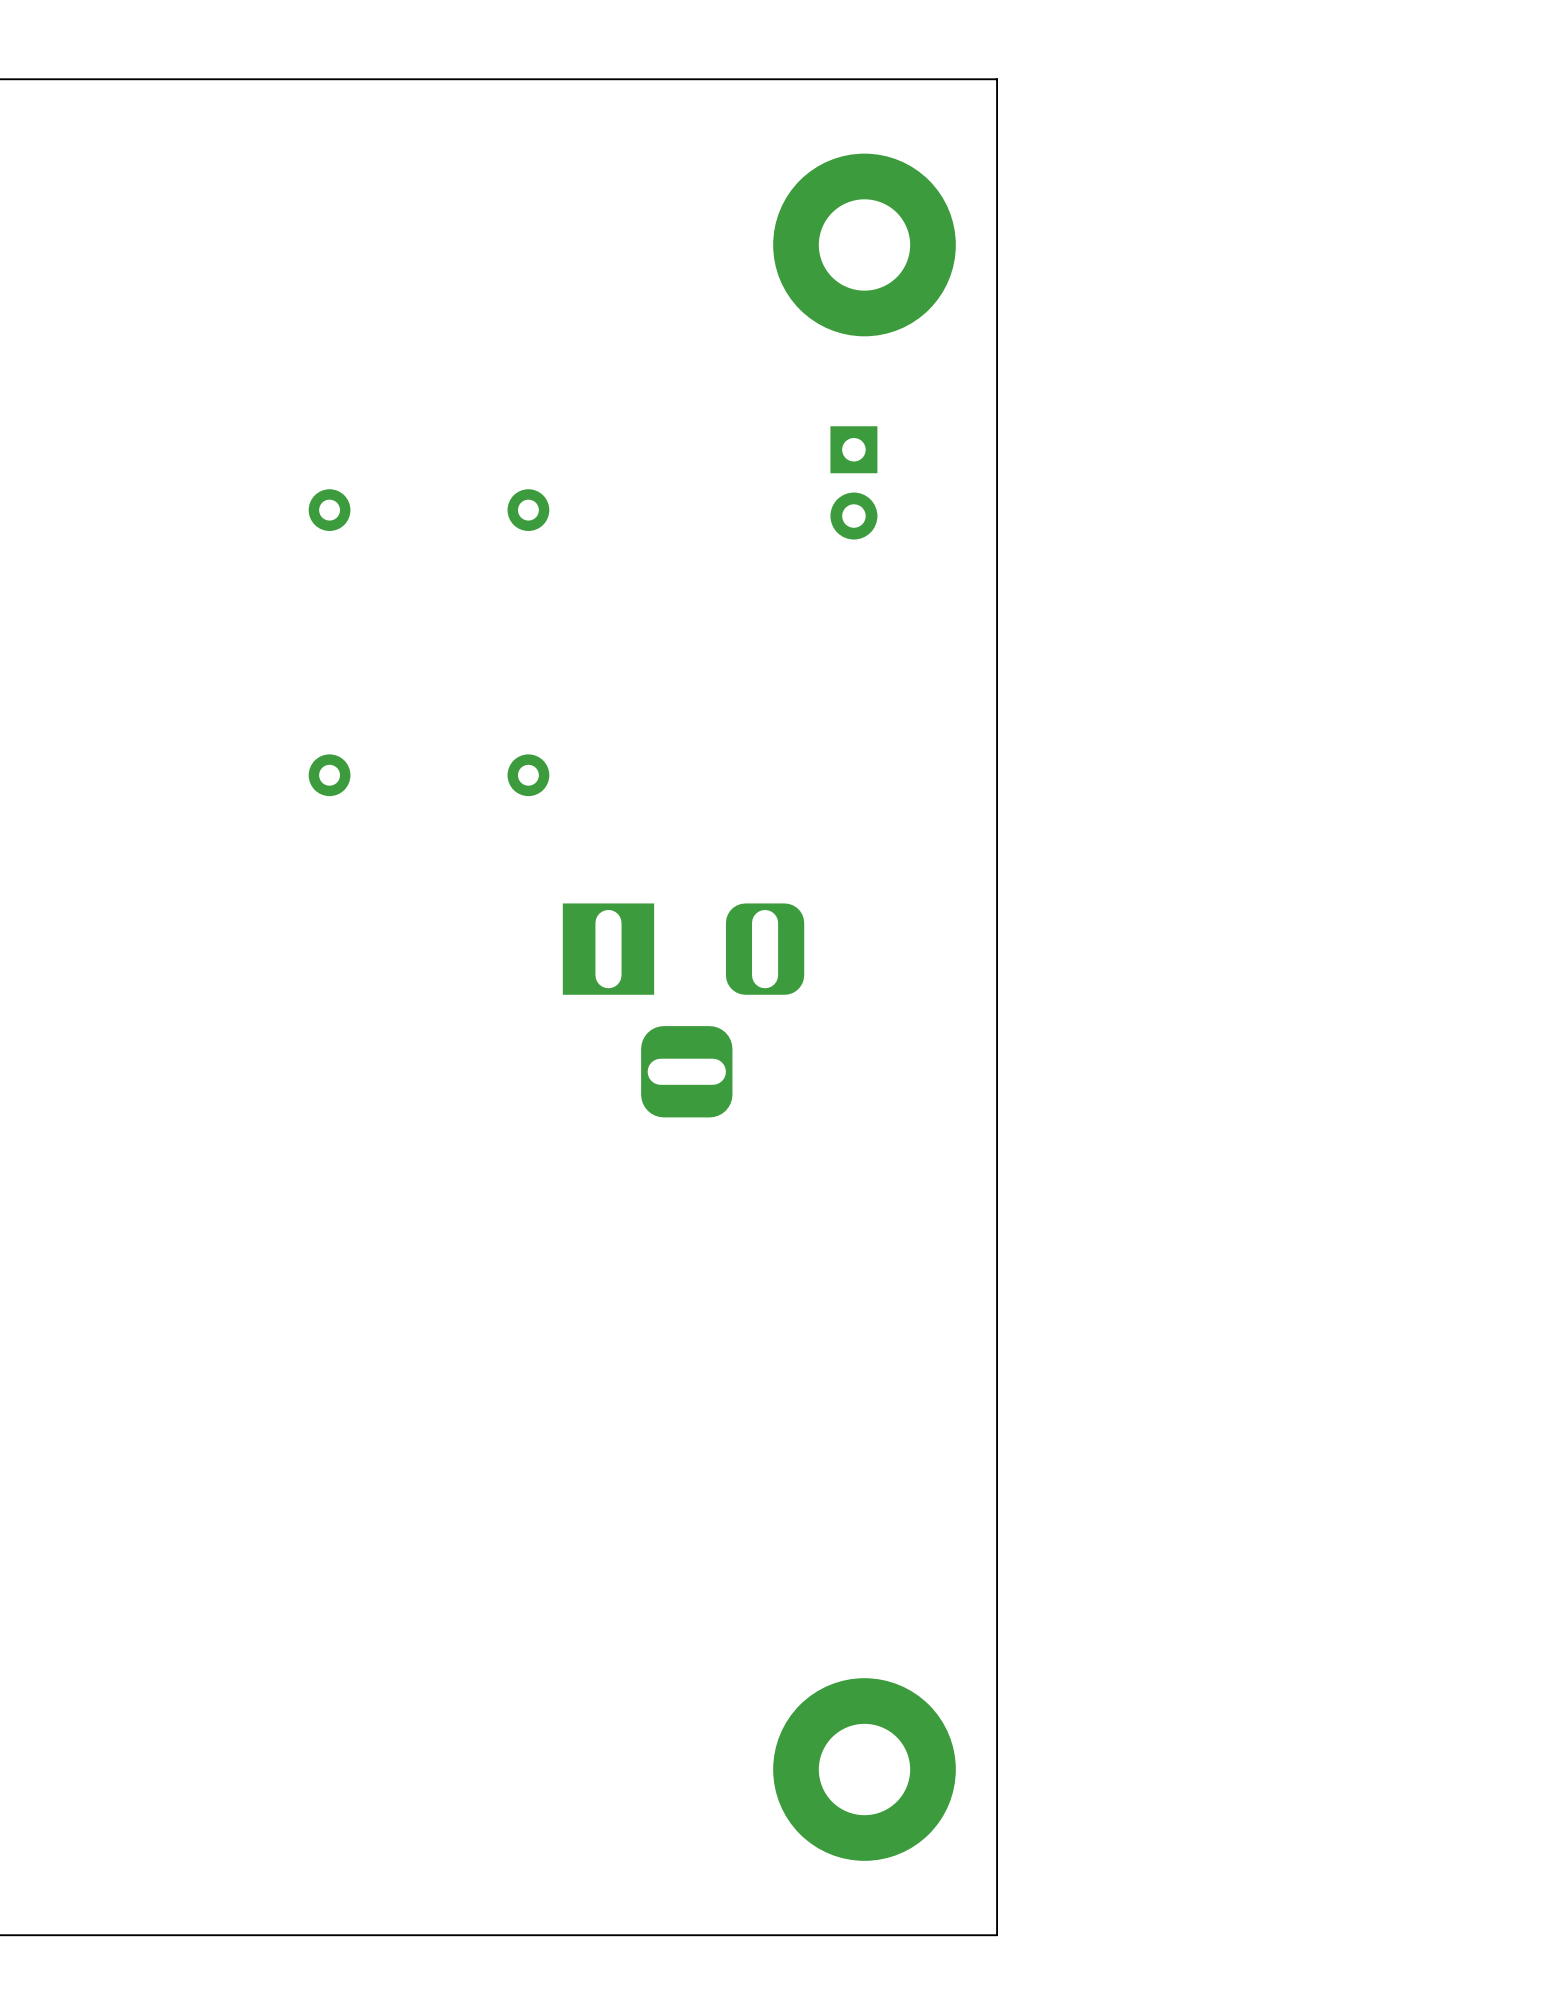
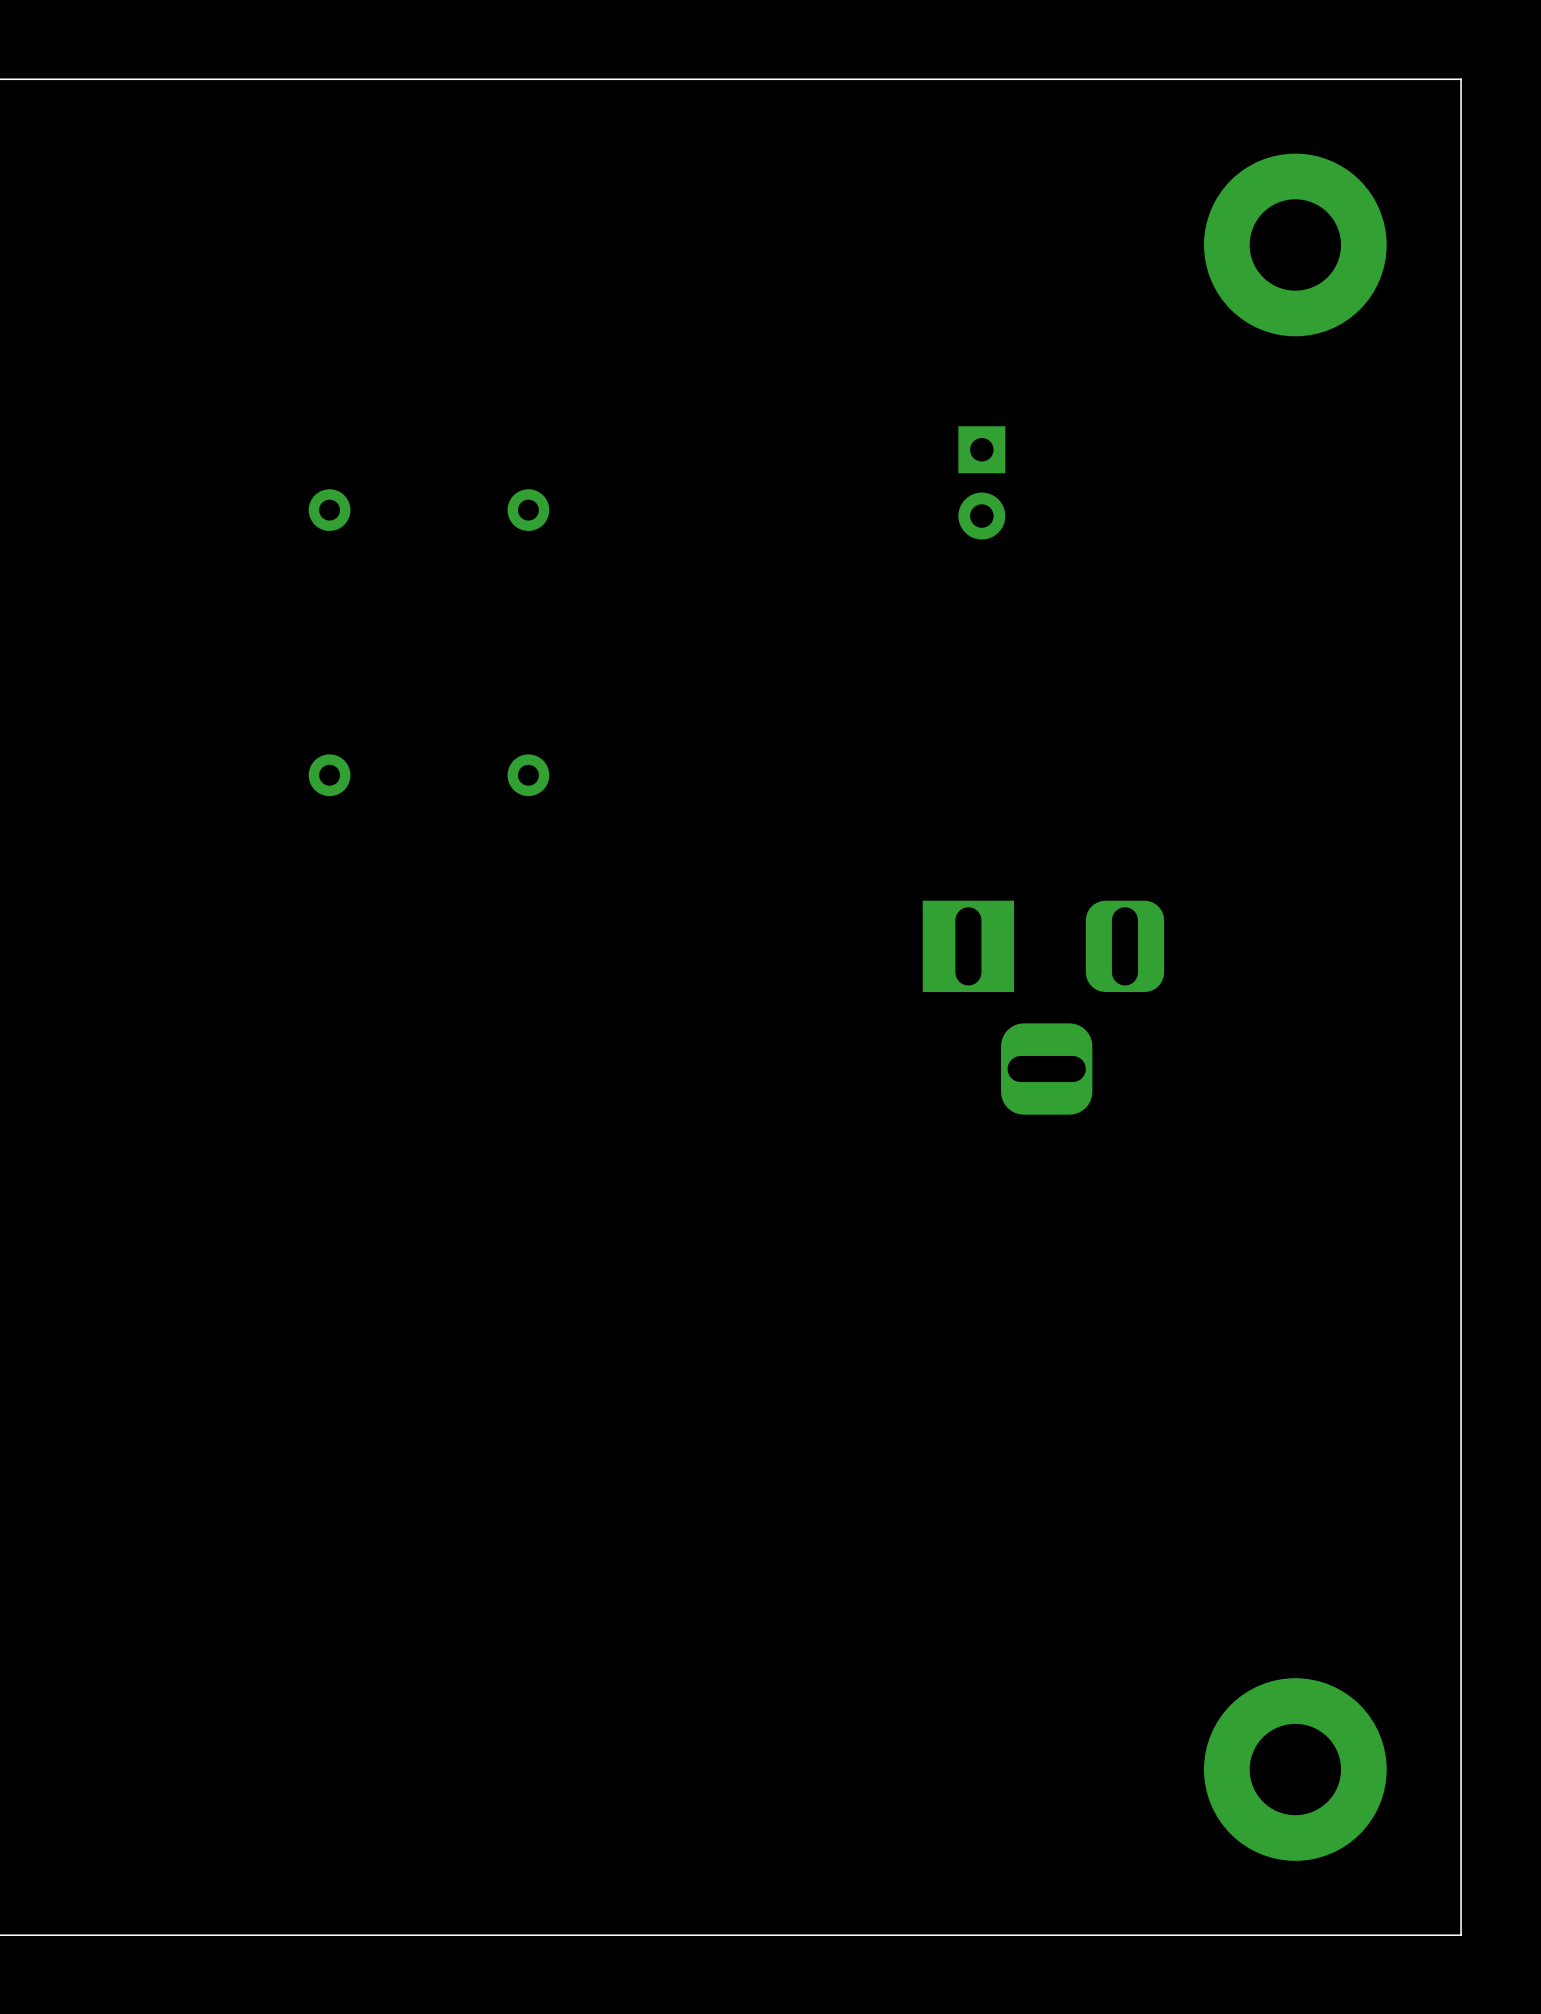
board edge: (997, 79) (997, 1935) -> (997, 79) (1461, 79) (1461, 1935) (997, 1935)
part position: (864, 244) -> (1295, 244)
part position: (853, 482) -> (981, 482)
part position: (683, 1010) -> (1043, 1007)
part position: (864, 1769) -> (1295, 1769)

